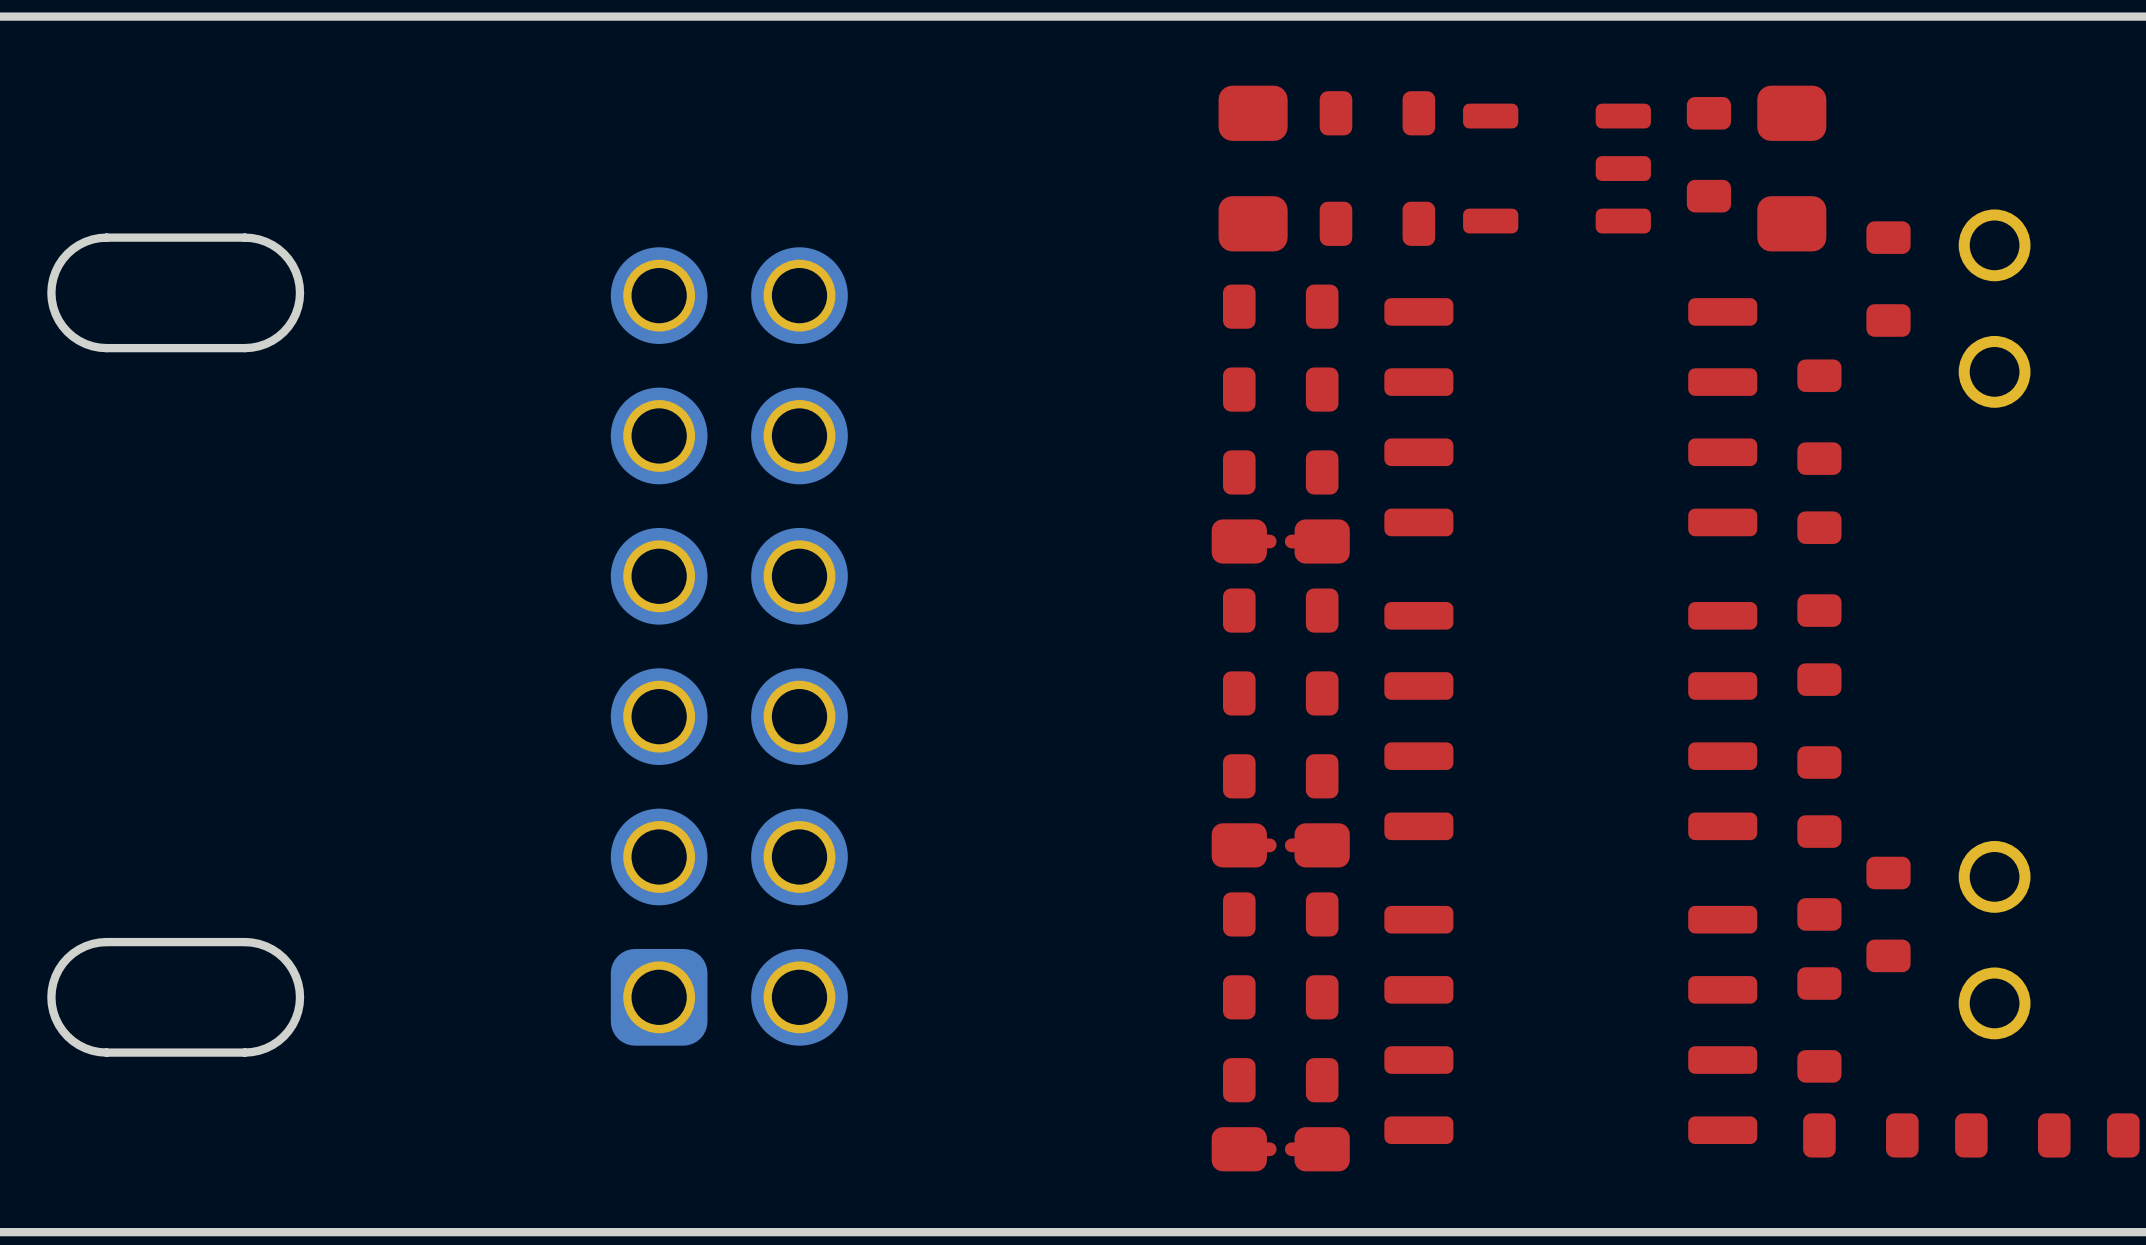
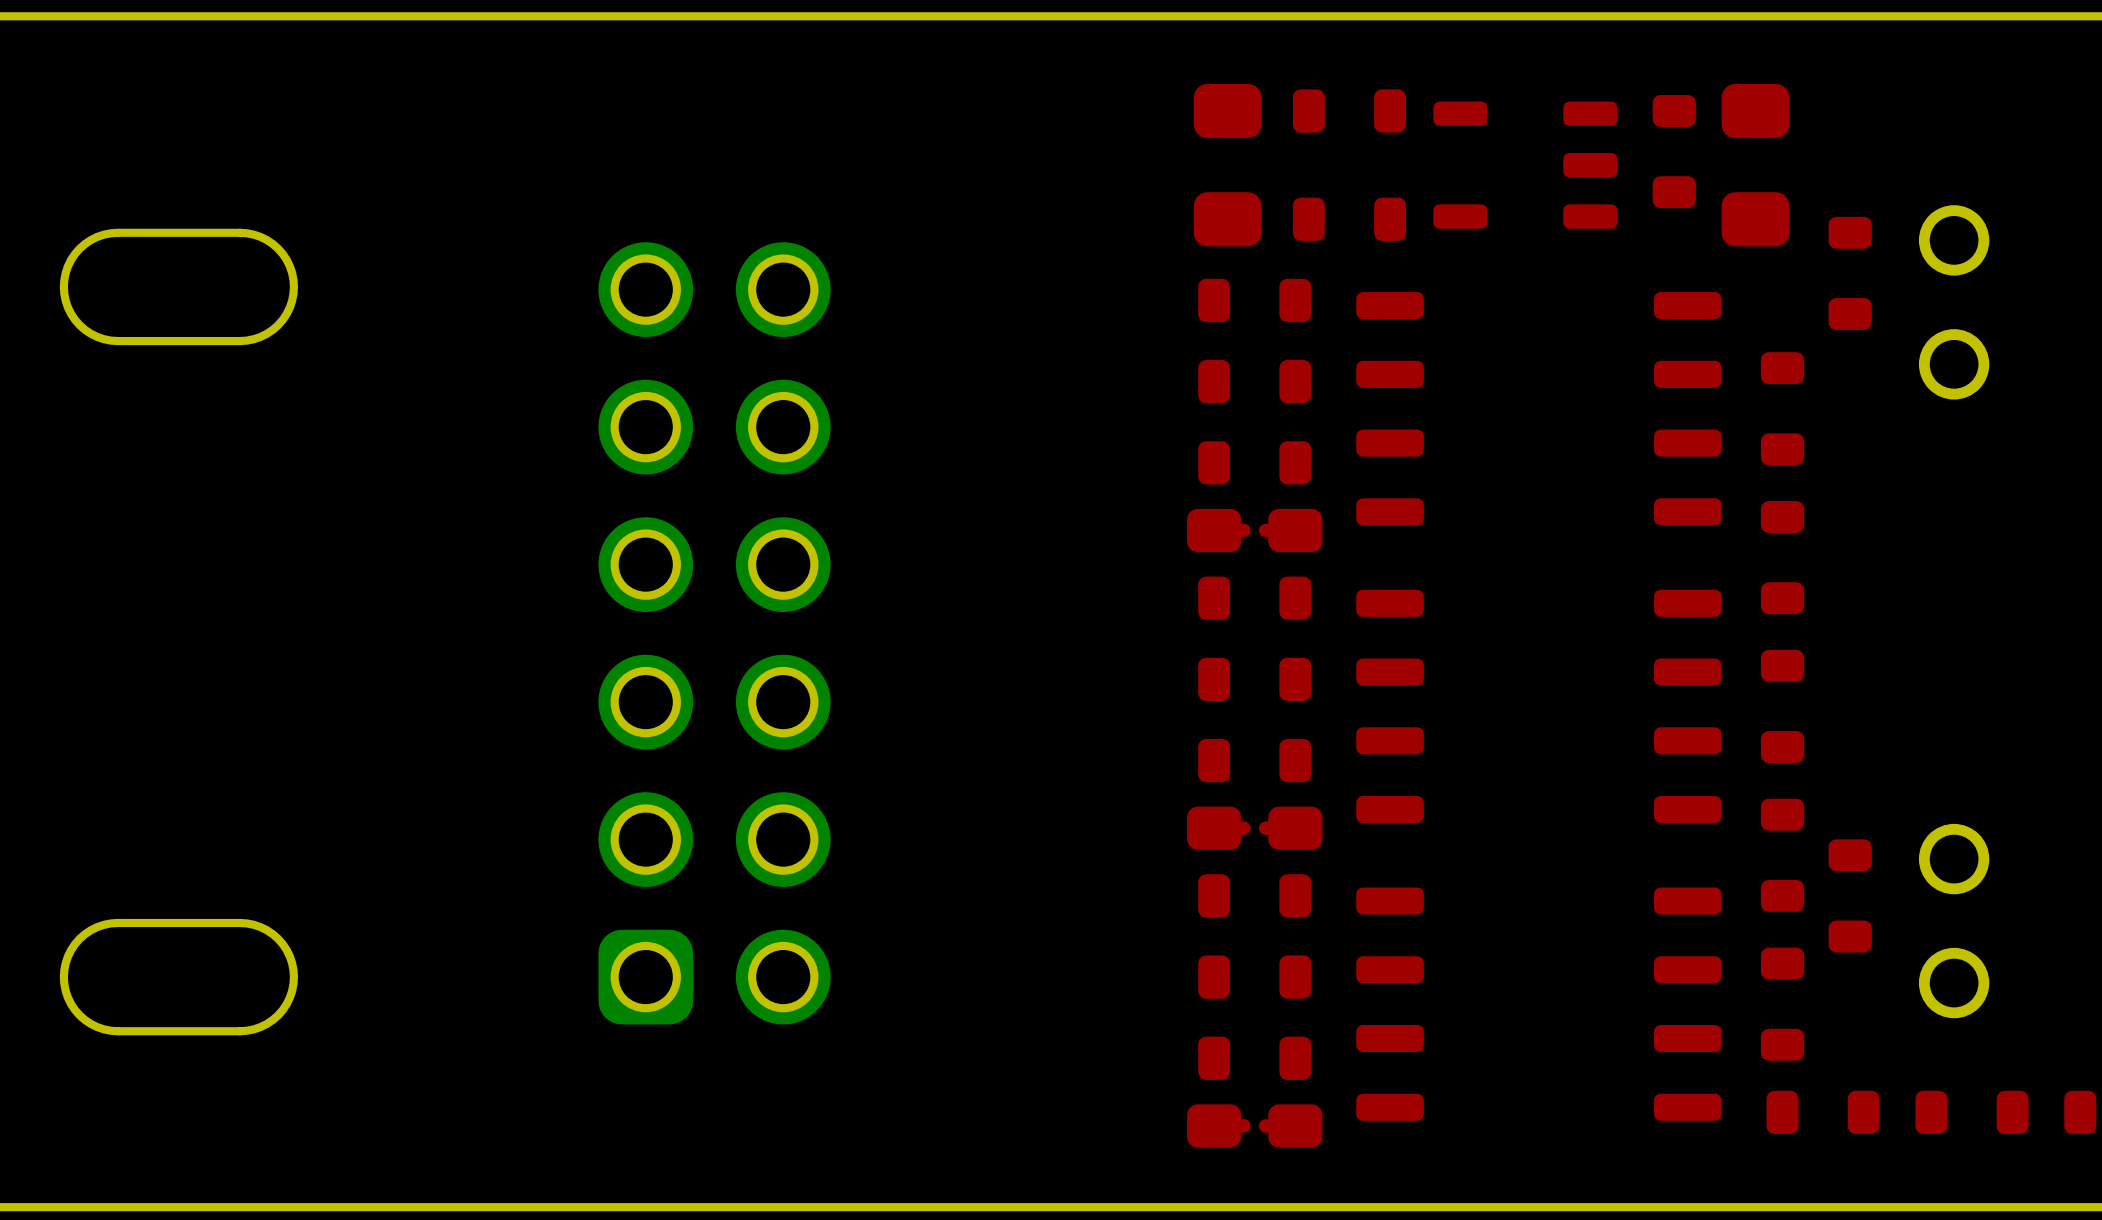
board edge: (120, 237) (92, 239) (73, 249) (58, 265) (53, 278) (51, 292) (53, 307) (58, 320) (73, 336) (92, 346) (120, 348) -> (118, 232) (97, 236) (79, 248) (67, 266) (63, 286) (67, 307) (79, 325) (97, 336) (118, 341)
board edge: (120, 942) (92, 943) (73, 953) (58, 969) (53, 983) (51, 997) (53, 1011) (58, 1024) (73, 1041) (92, 1050) (120, 1052) -> (118, 922) (97, 927) (79, 938) (67, 956) (63, 977) (67, 997) (79, 1015) (97, 1027) (118, 1031)

